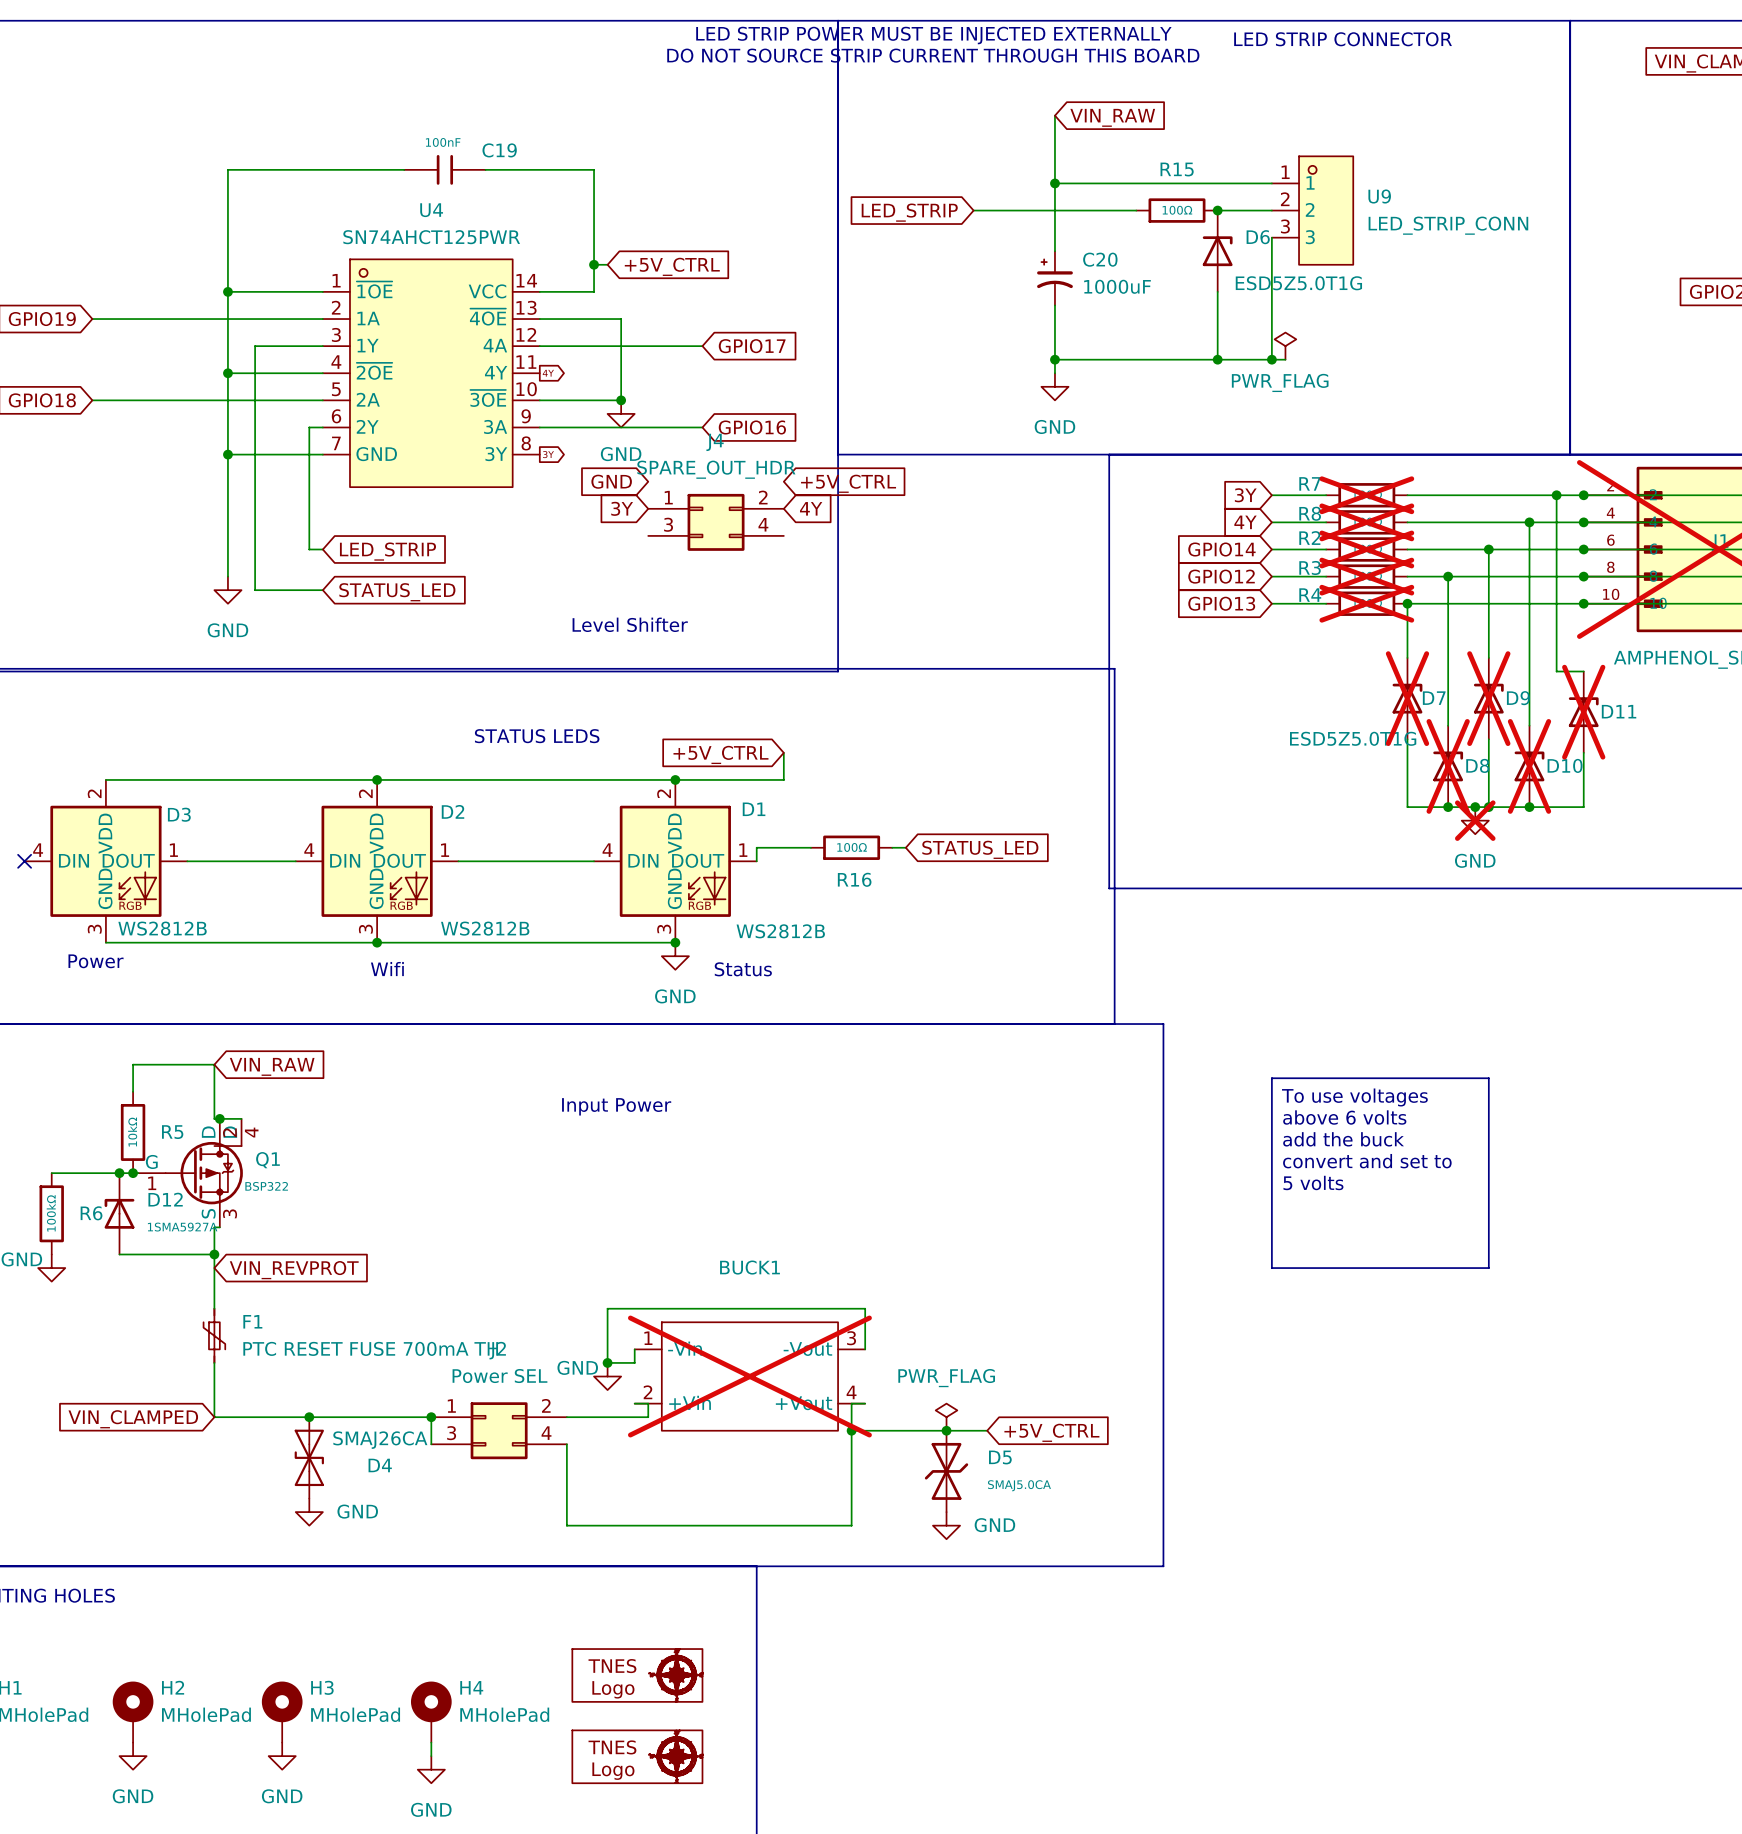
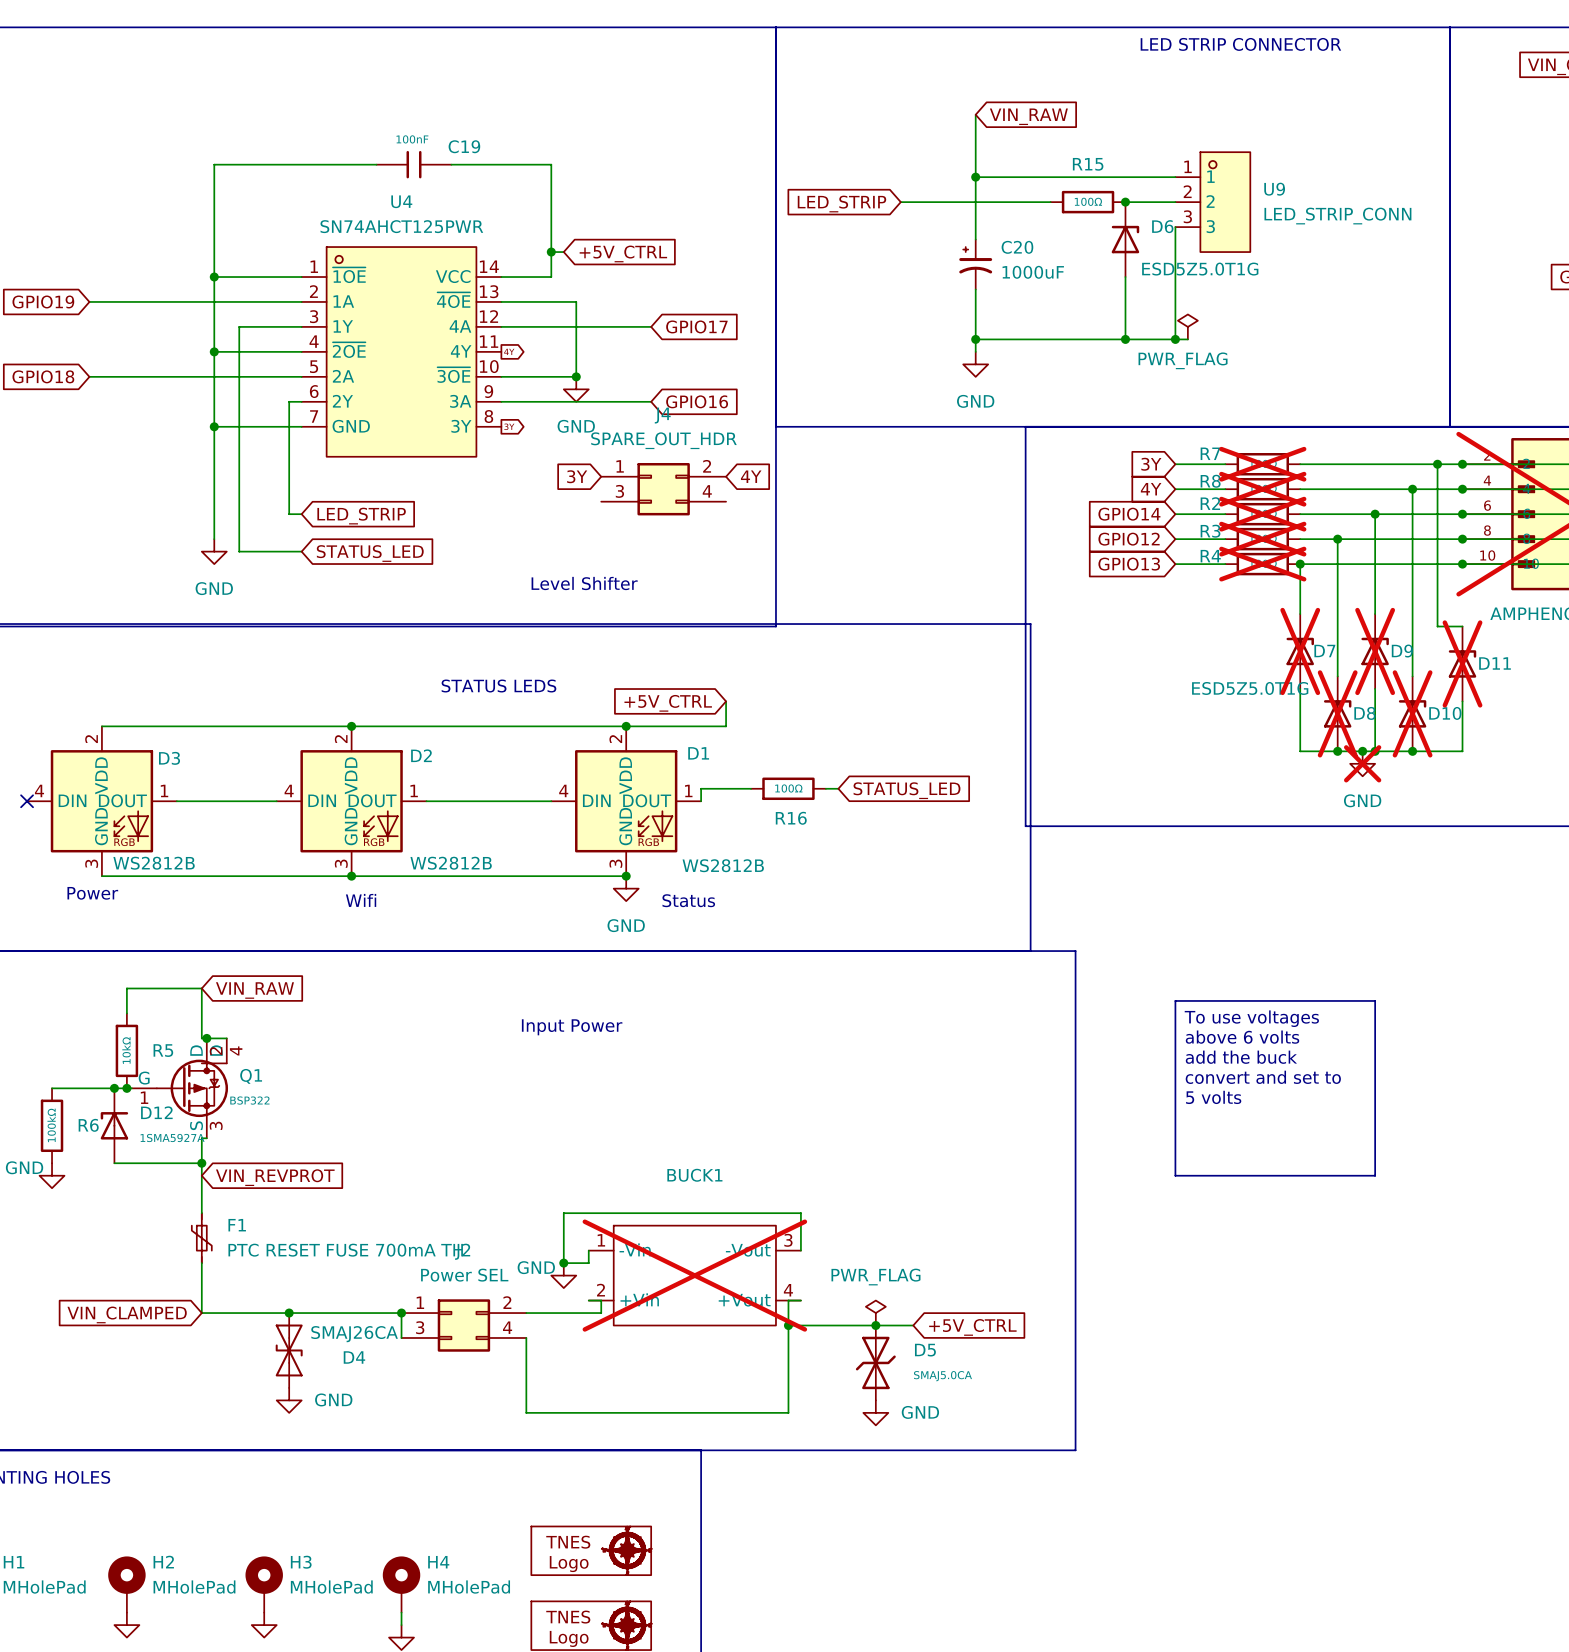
text: LED STRIP POWER MUST BE INJECTED EXTERNALLY (933, 35) -> none
text: DO NOT SOURCE STRIP CURRENT THROUGH THIS BOARD (933, 55) -> none
global label: GND (611, 481) -> none
global label: +5V_CTRL (848, 483) -> none

